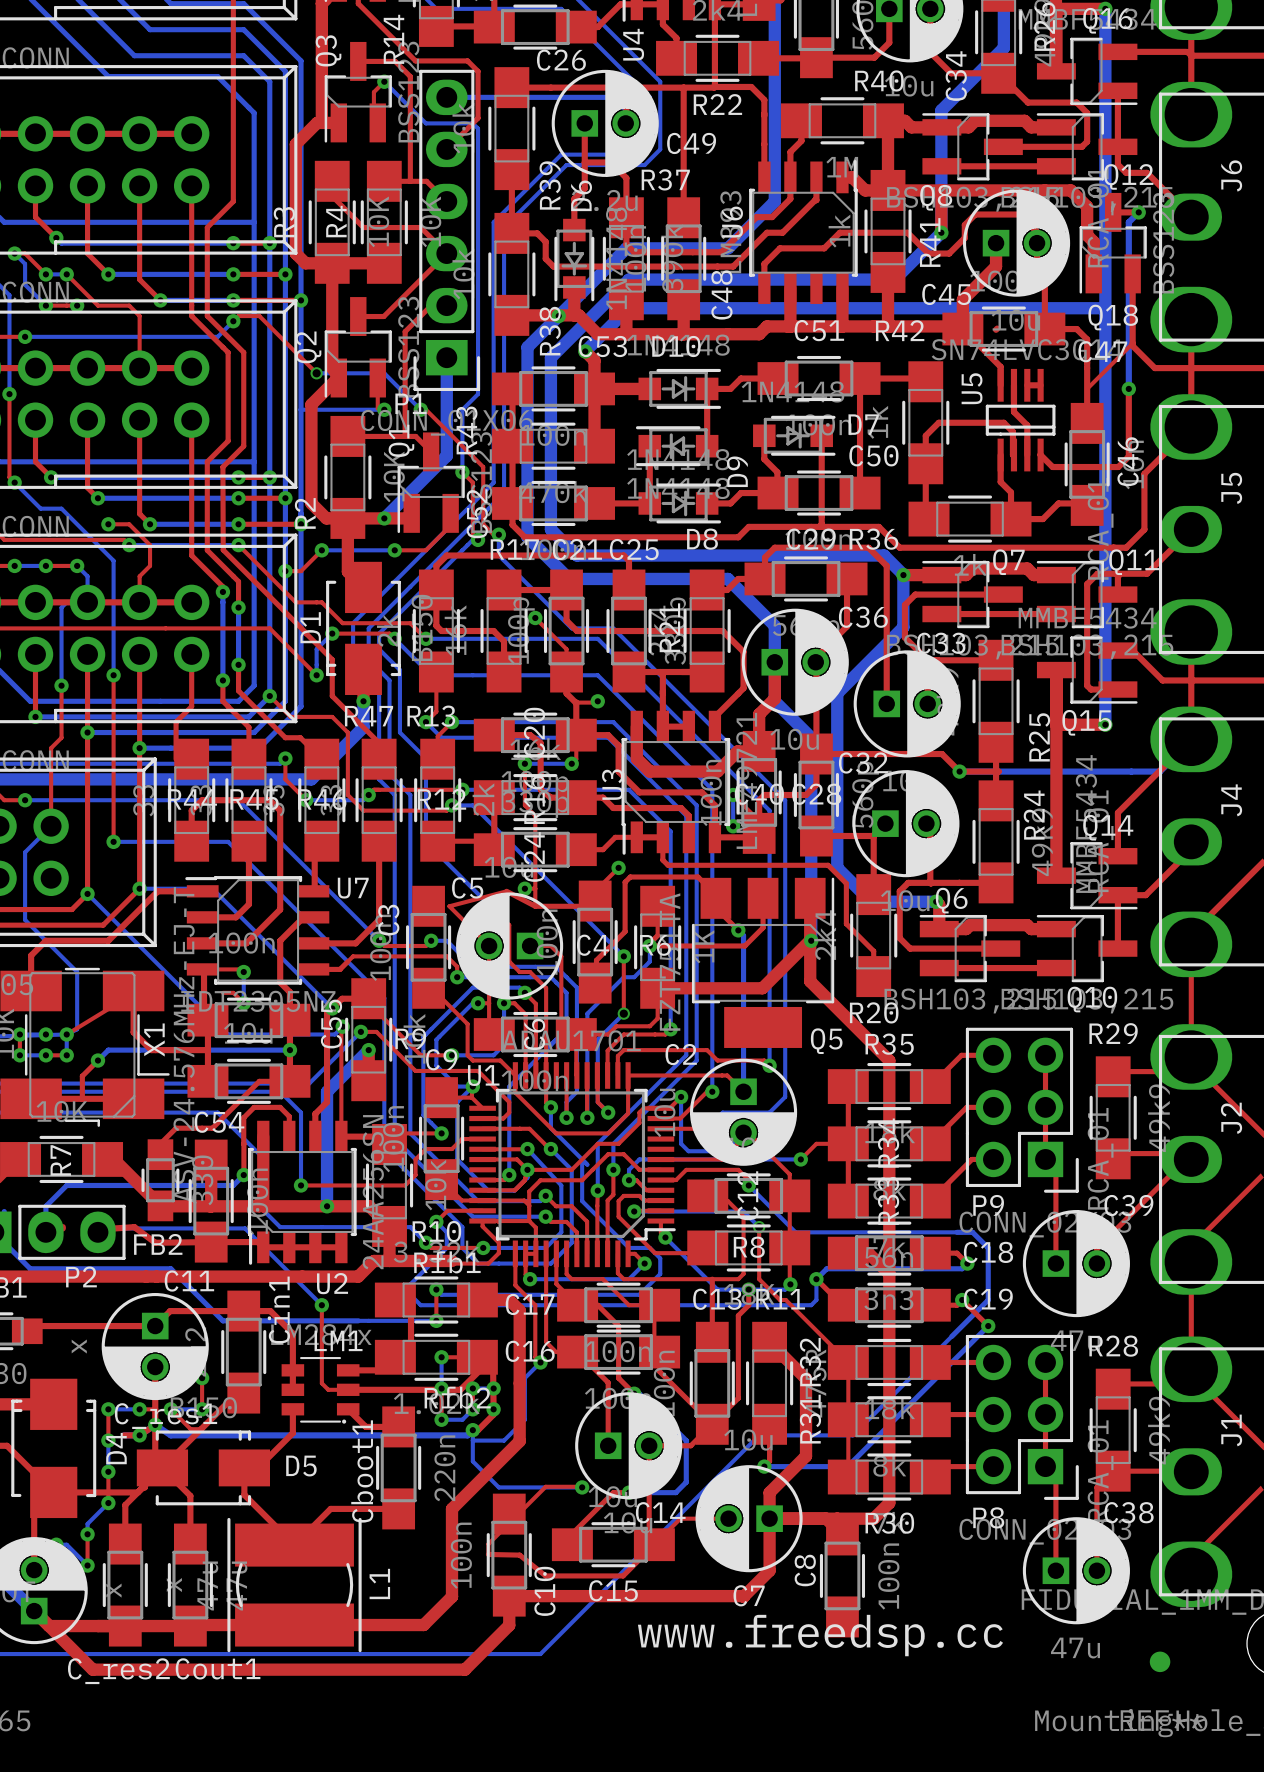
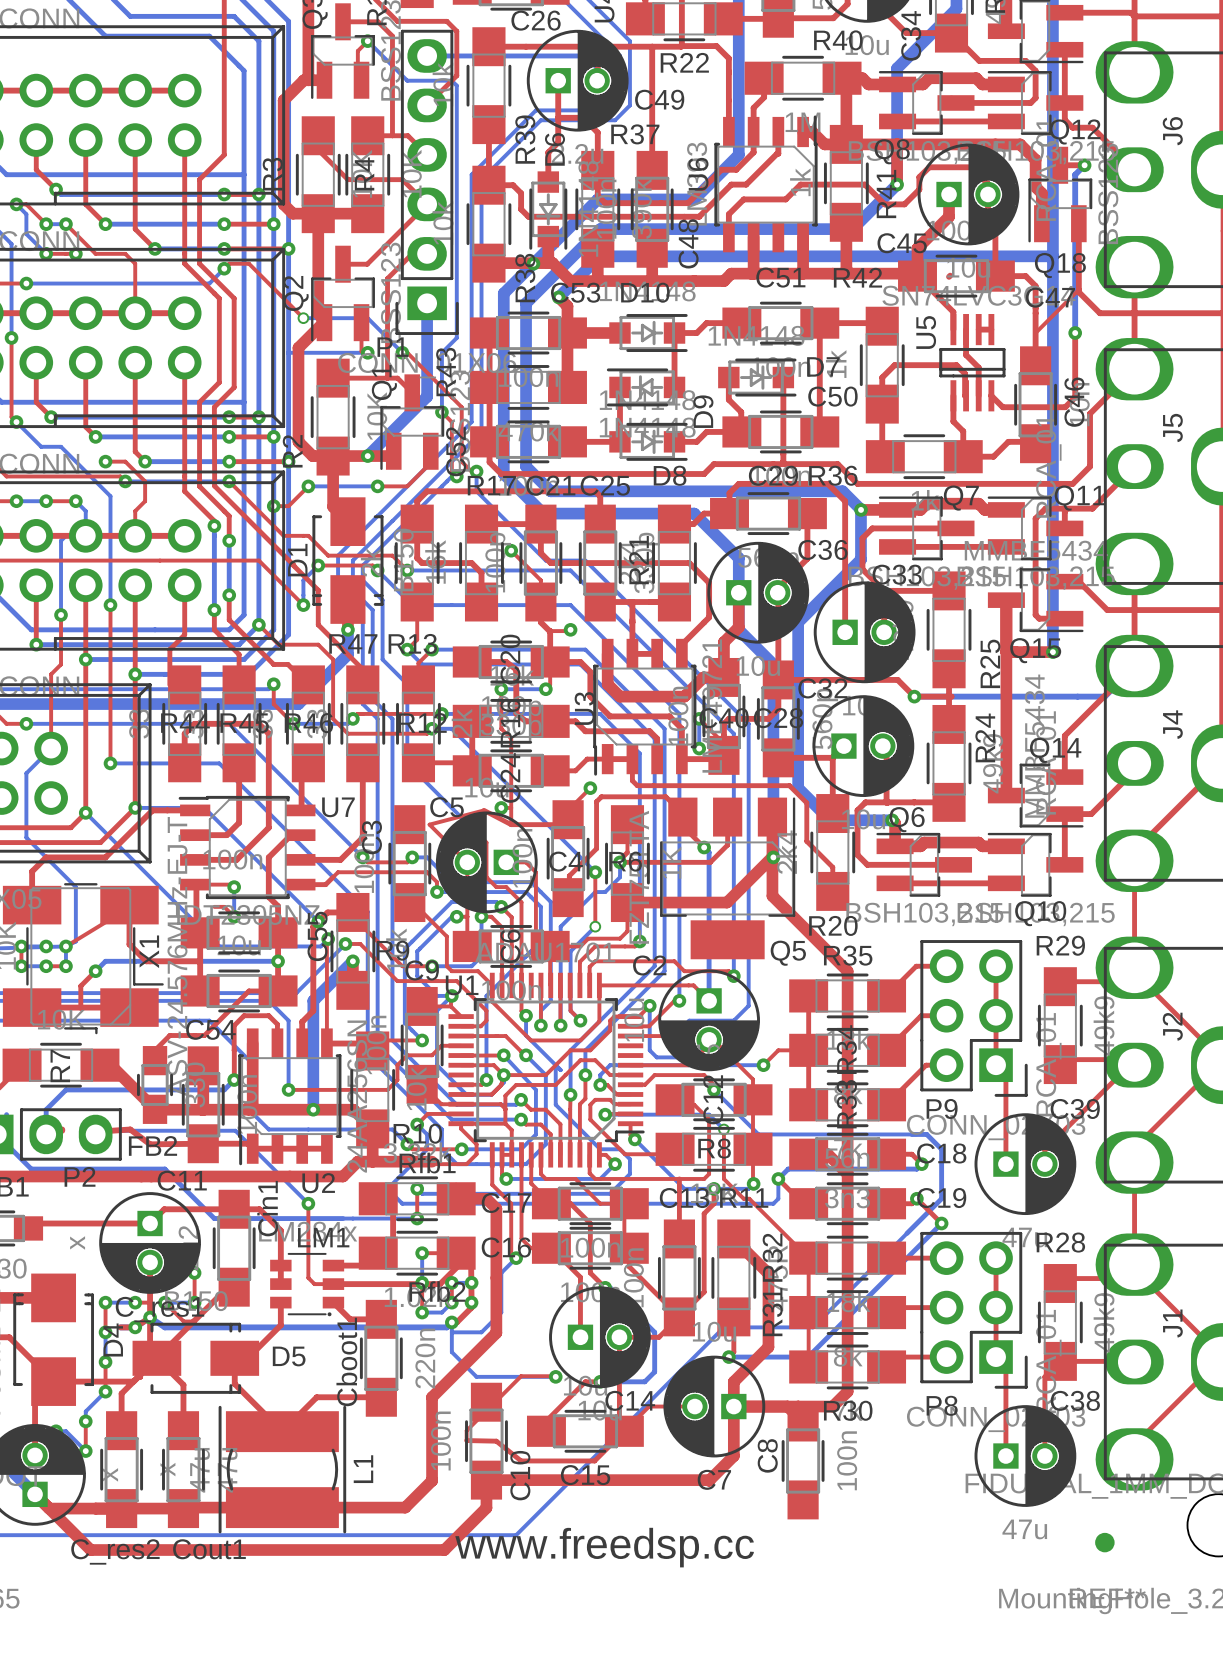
R4 name position: R4 (336, 221) -> R4 (364, 173)
text position: www.freedsp.cc (820, 1635) -> www.freedsp.cc (604, 1547)

